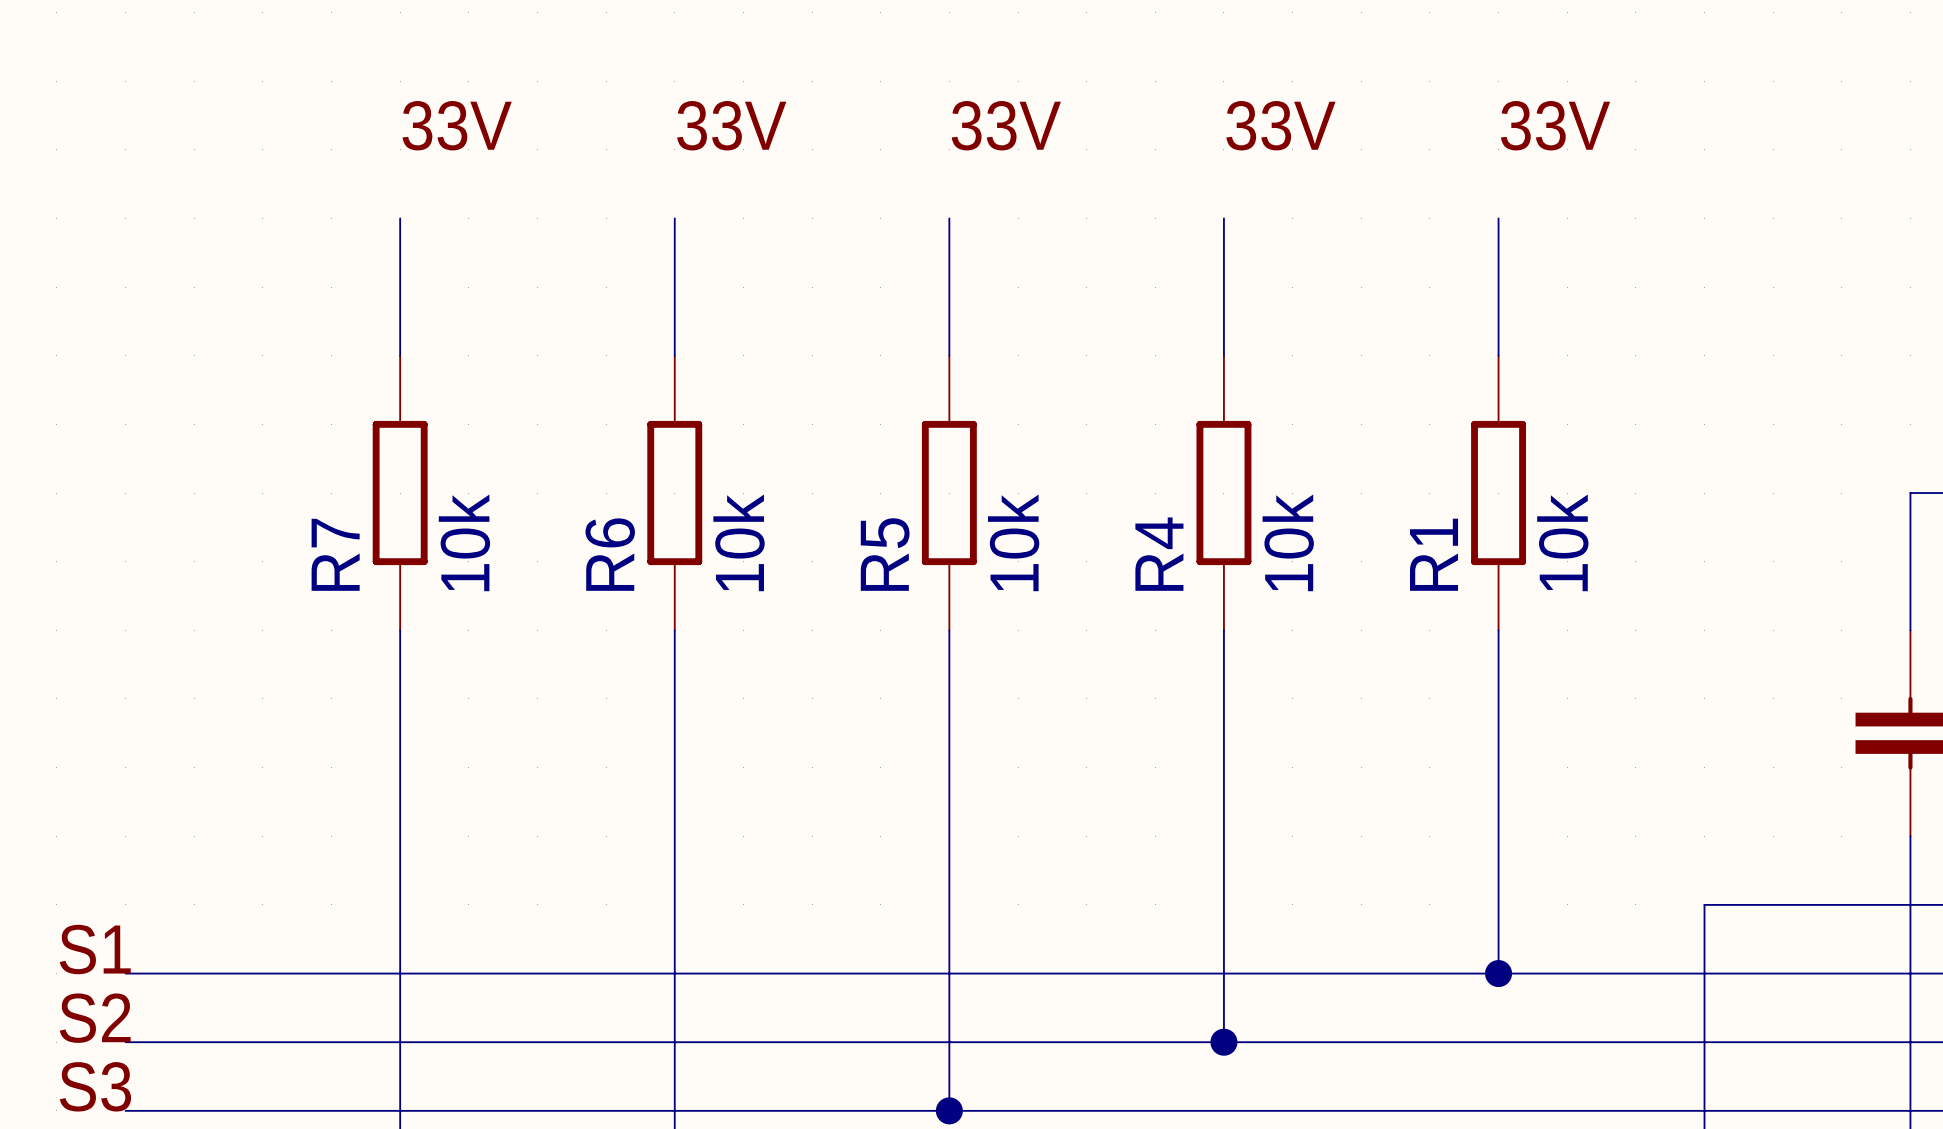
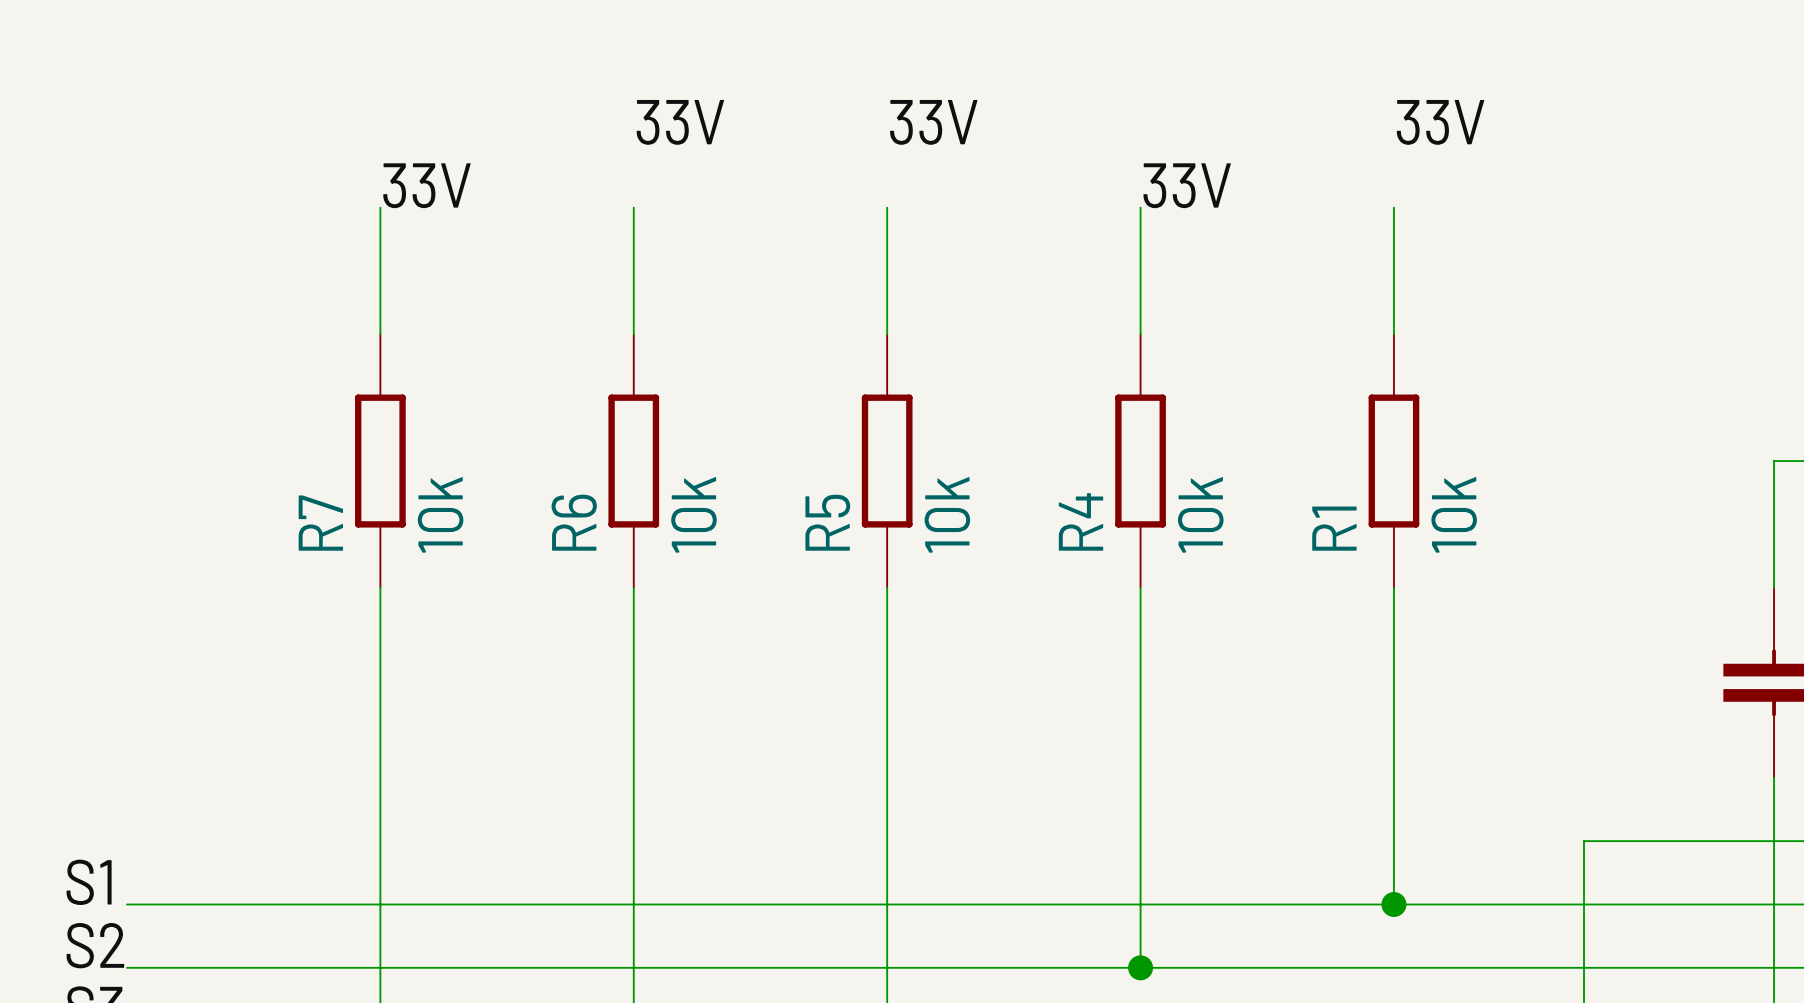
label position: 33V (457, 125) -> 33V (427, 185)
label position: 33V (1280, 125) -> 33V (1187, 185)

